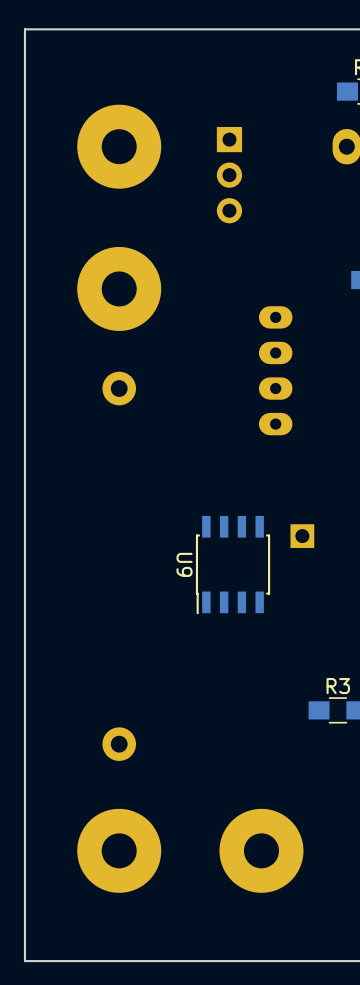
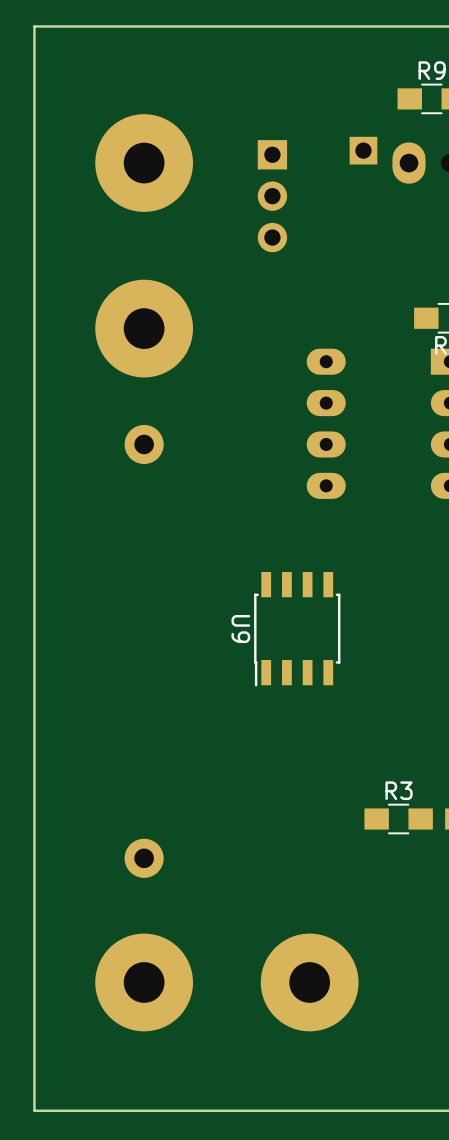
part: none -> (363, 150)
part: (302, 536) -> none
U9 position: (233, 565) -> (297, 629)

